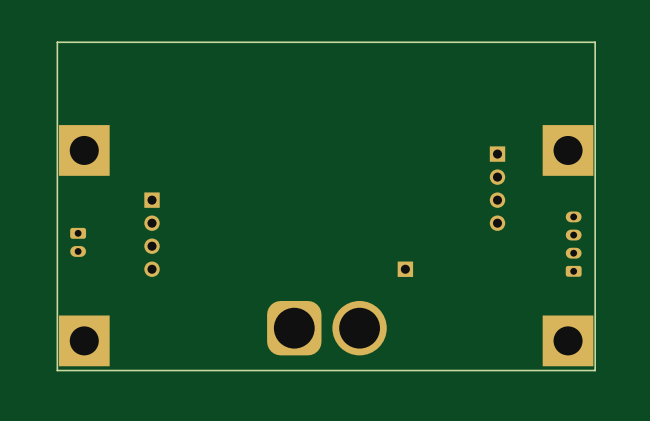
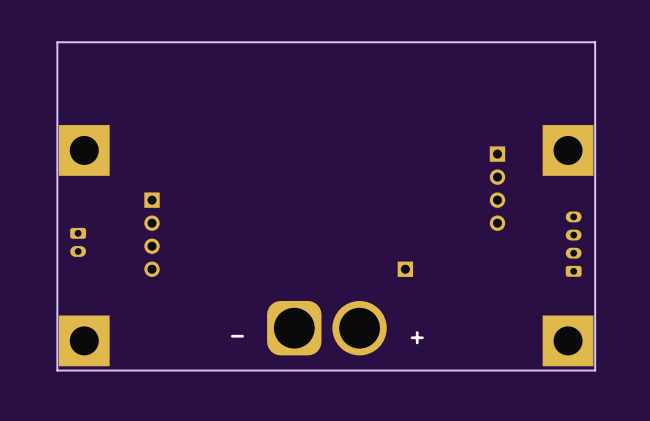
text: none -> - (237, 336)
text: none -> + (417, 337)

